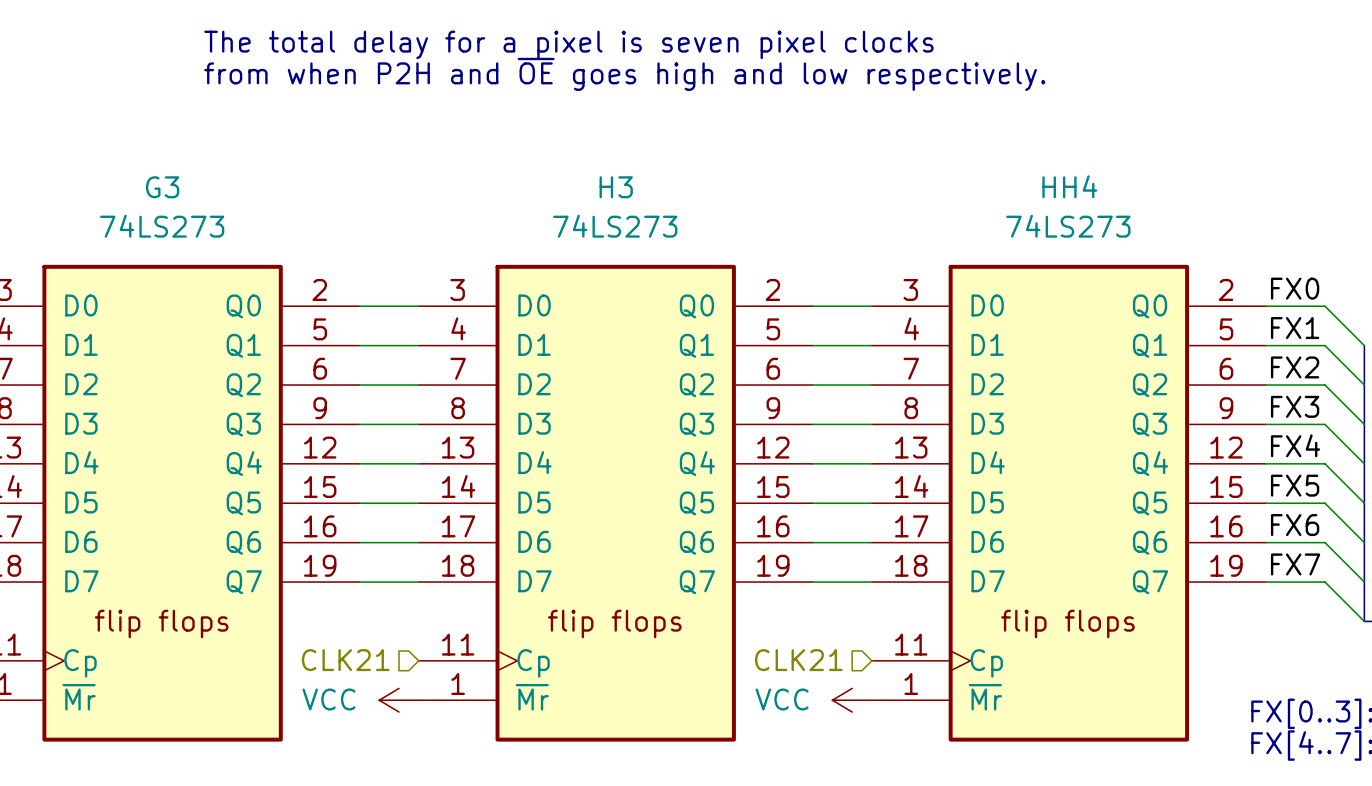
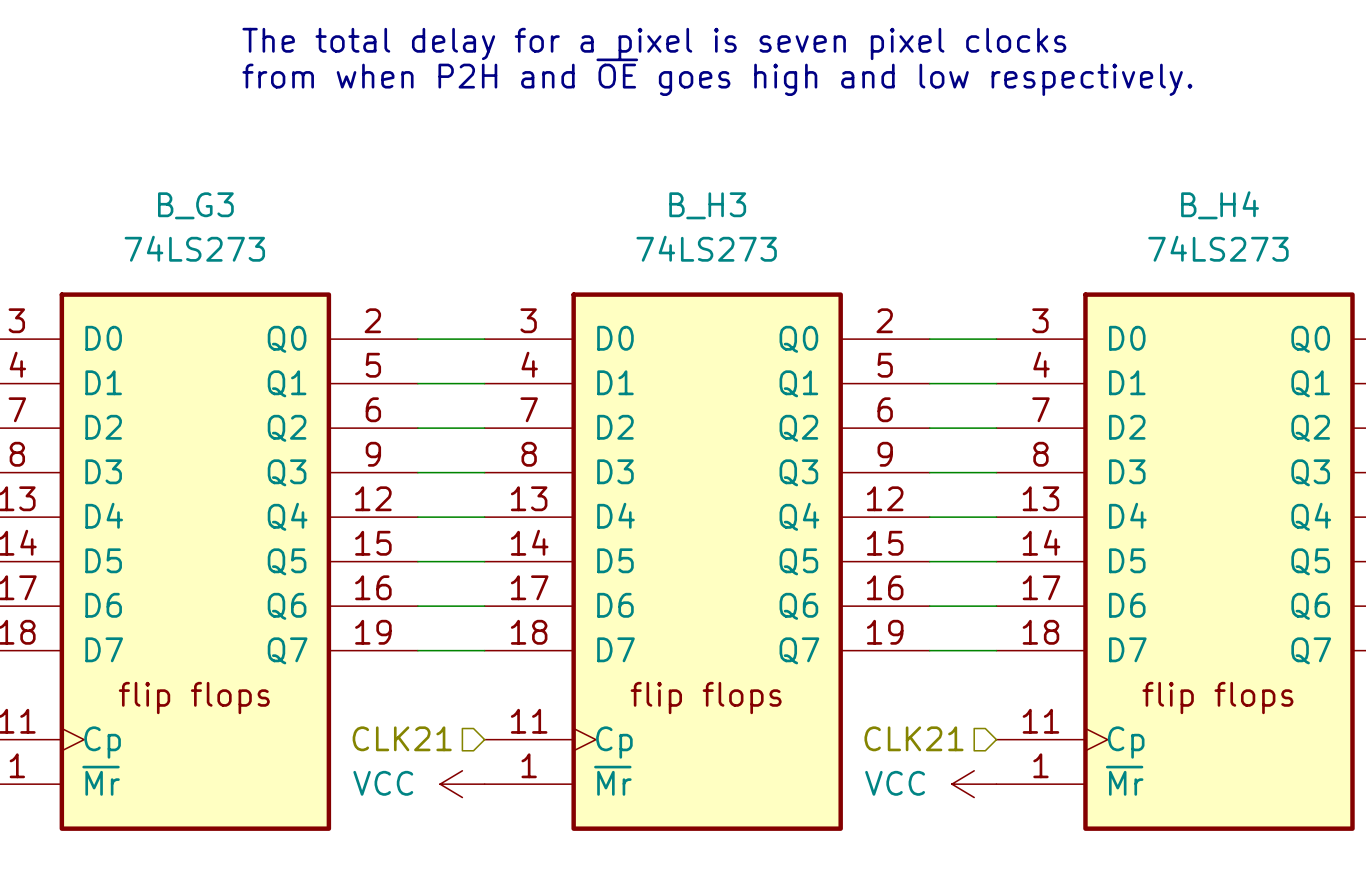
HH4 name: HH4 (1069, 186) -> B_H4 (1220, 205)
G3 name: G3 (162, 187) -> B_G3 (195, 205)
H3 name: H3 (616, 187) -> B_H3 (707, 205)

